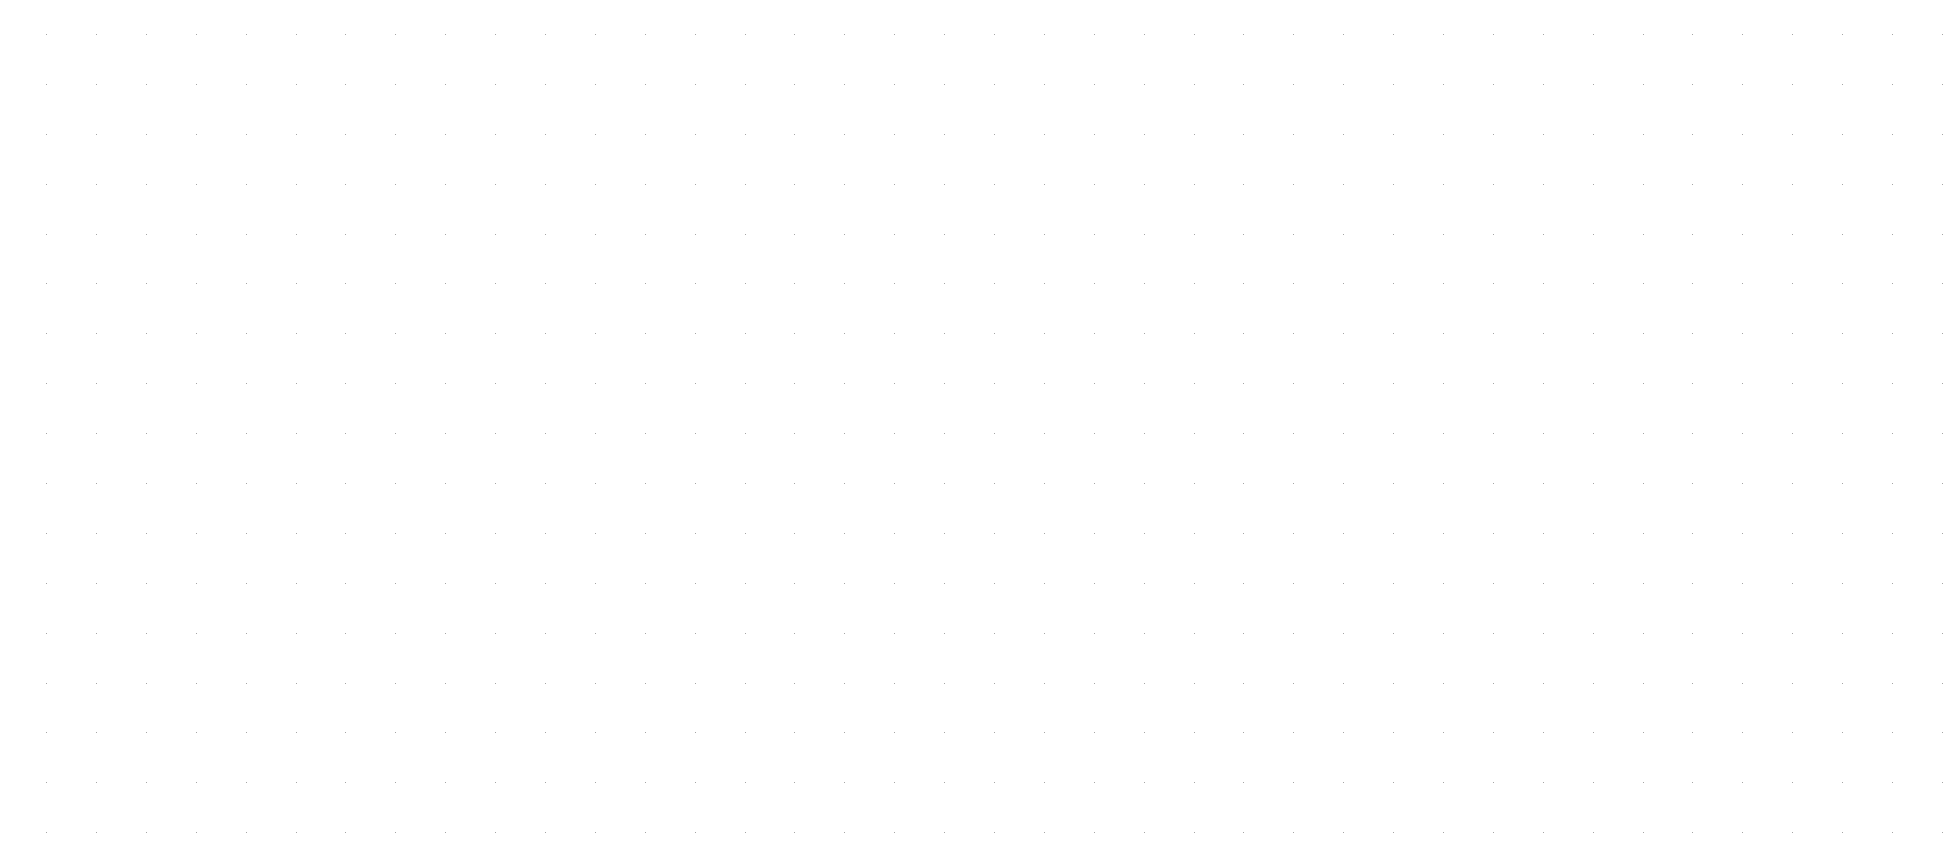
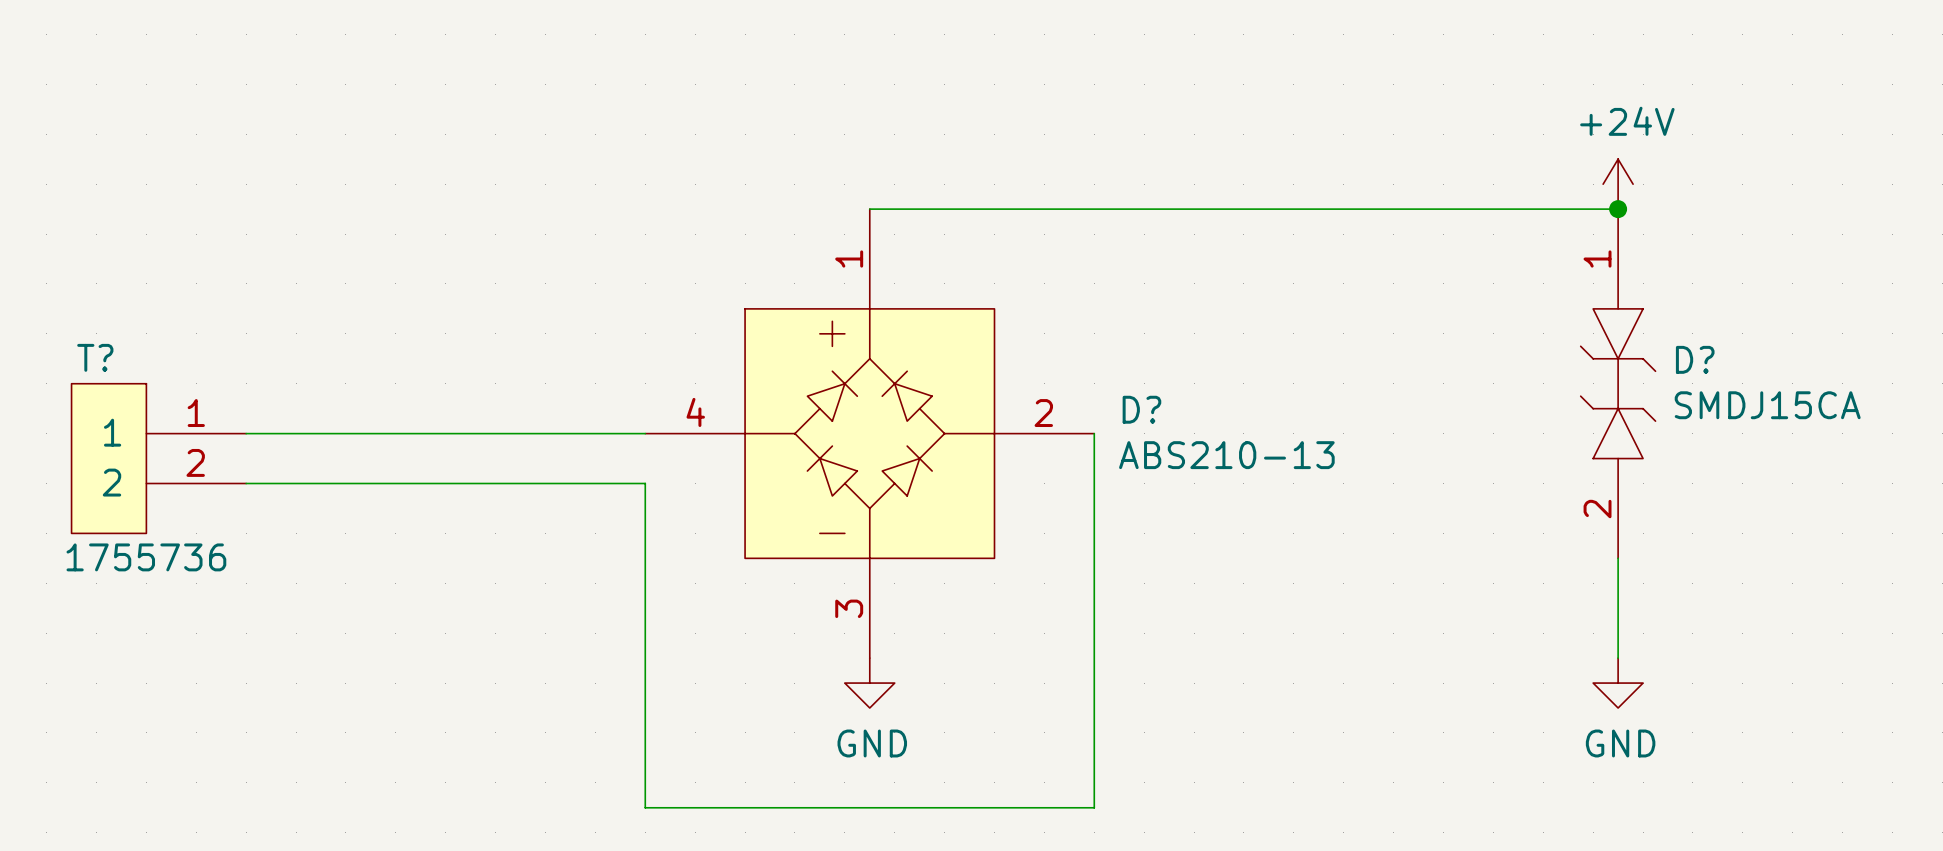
power symbol: none -> +24V (1618, 184)
wire: none -> (869, 209) (1618, 209)
junction: none -> (1618, 209)
D?: none -> (1618, 383)
wire: none -> (246, 433) (645, 433)
D?: none -> (869, 433)
wire: none -> (1094, 433) (1094, 807) (645, 807) (645, 483) (246, 483)
T?: none -> 1755736 (158, 458)
wire: none -> (1618, 558) (1618, 658)
power symbol: none -> GND (869, 683)
power symbol: none -> GND (1618, 683)

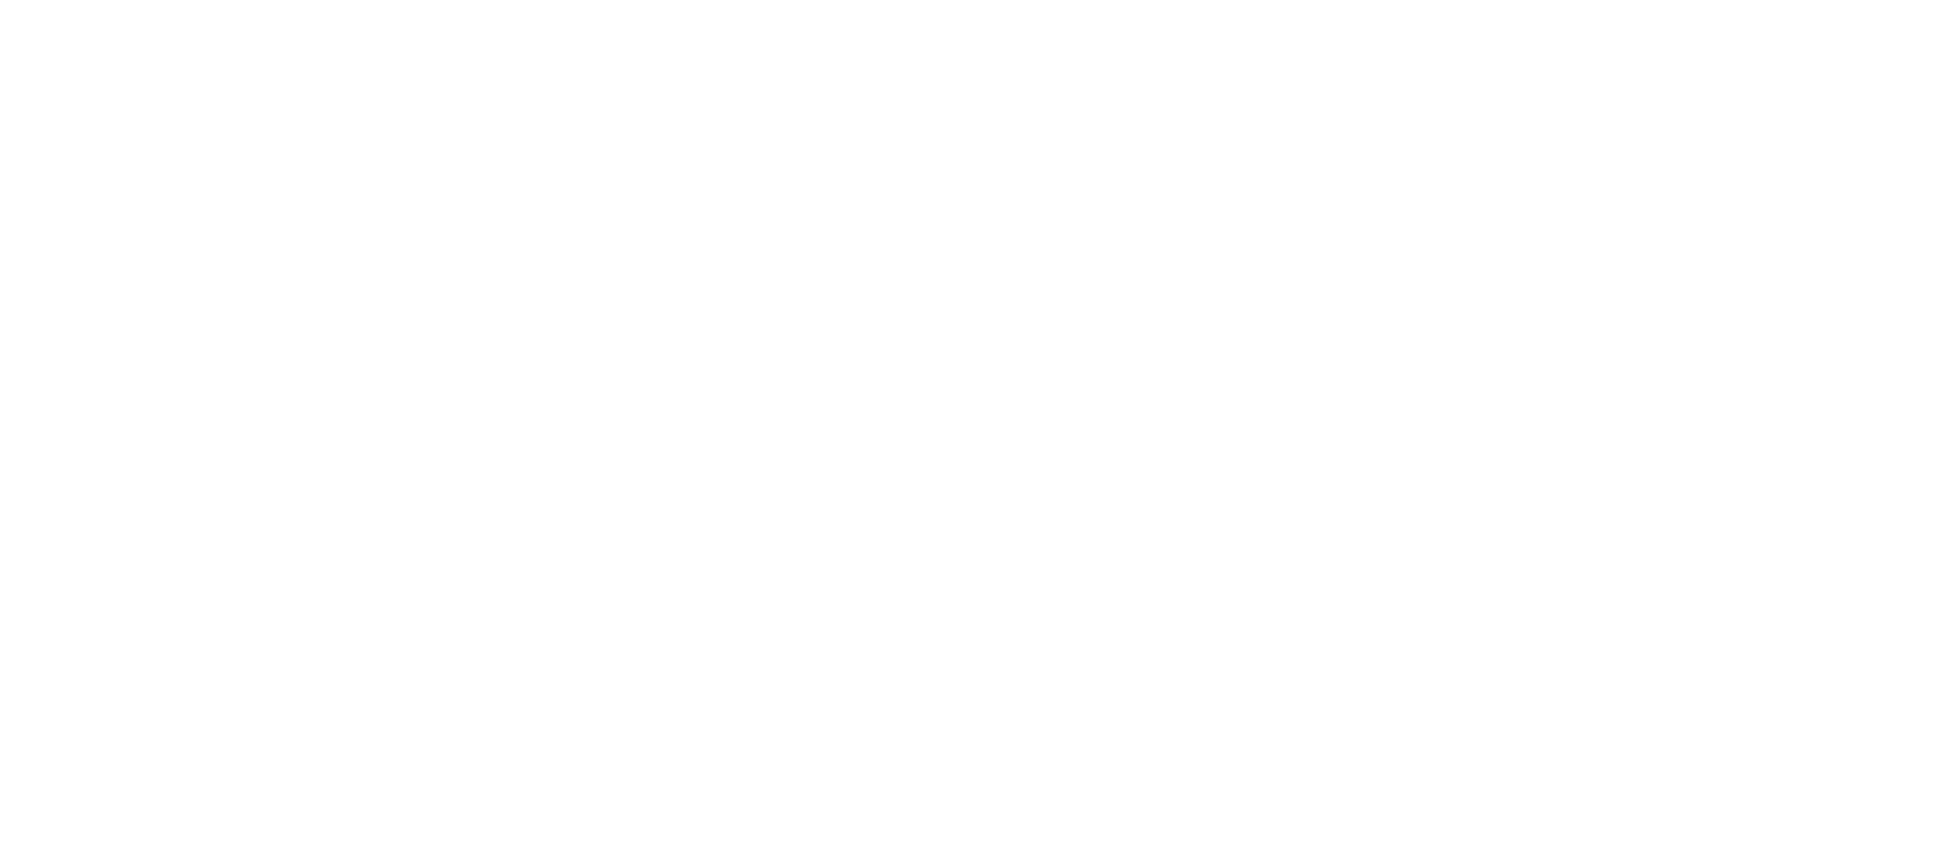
power symbol: +24V (1618, 184) -> none
wire: (869, 209) (1618, 209) -> none
junction: (1618, 209) -> none
D?: (1618, 383) -> none
wire: (246, 433) (645, 433) -> none
D?: (869, 433) -> none
wire: (1094, 433) (1094, 807) (645, 807) (645, 483) (246, 483) -> none
T?: 1755736 (158, 458) -> none
wire: (1618, 558) (1618, 658) -> none
power symbol: GND (869, 683) -> none
power symbol: GND (1618, 683) -> none

